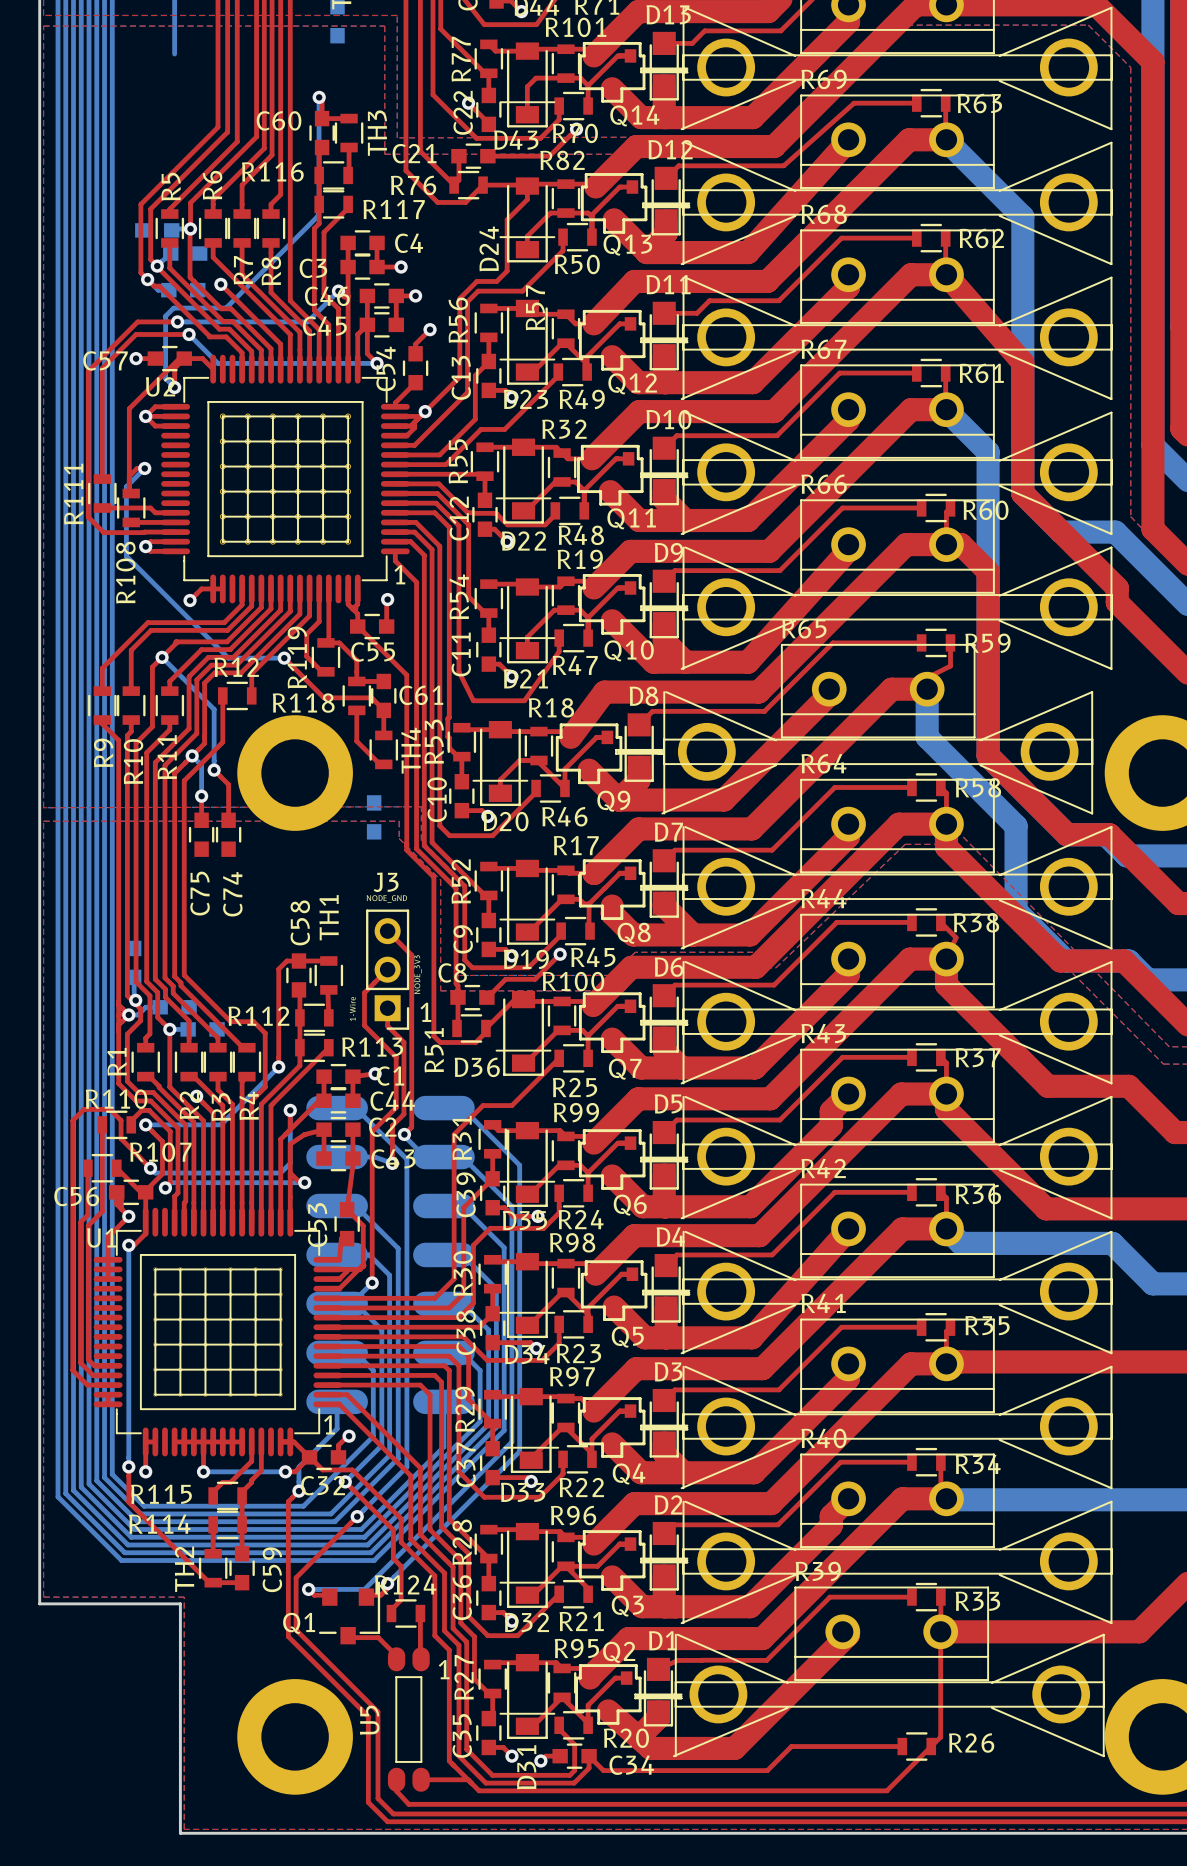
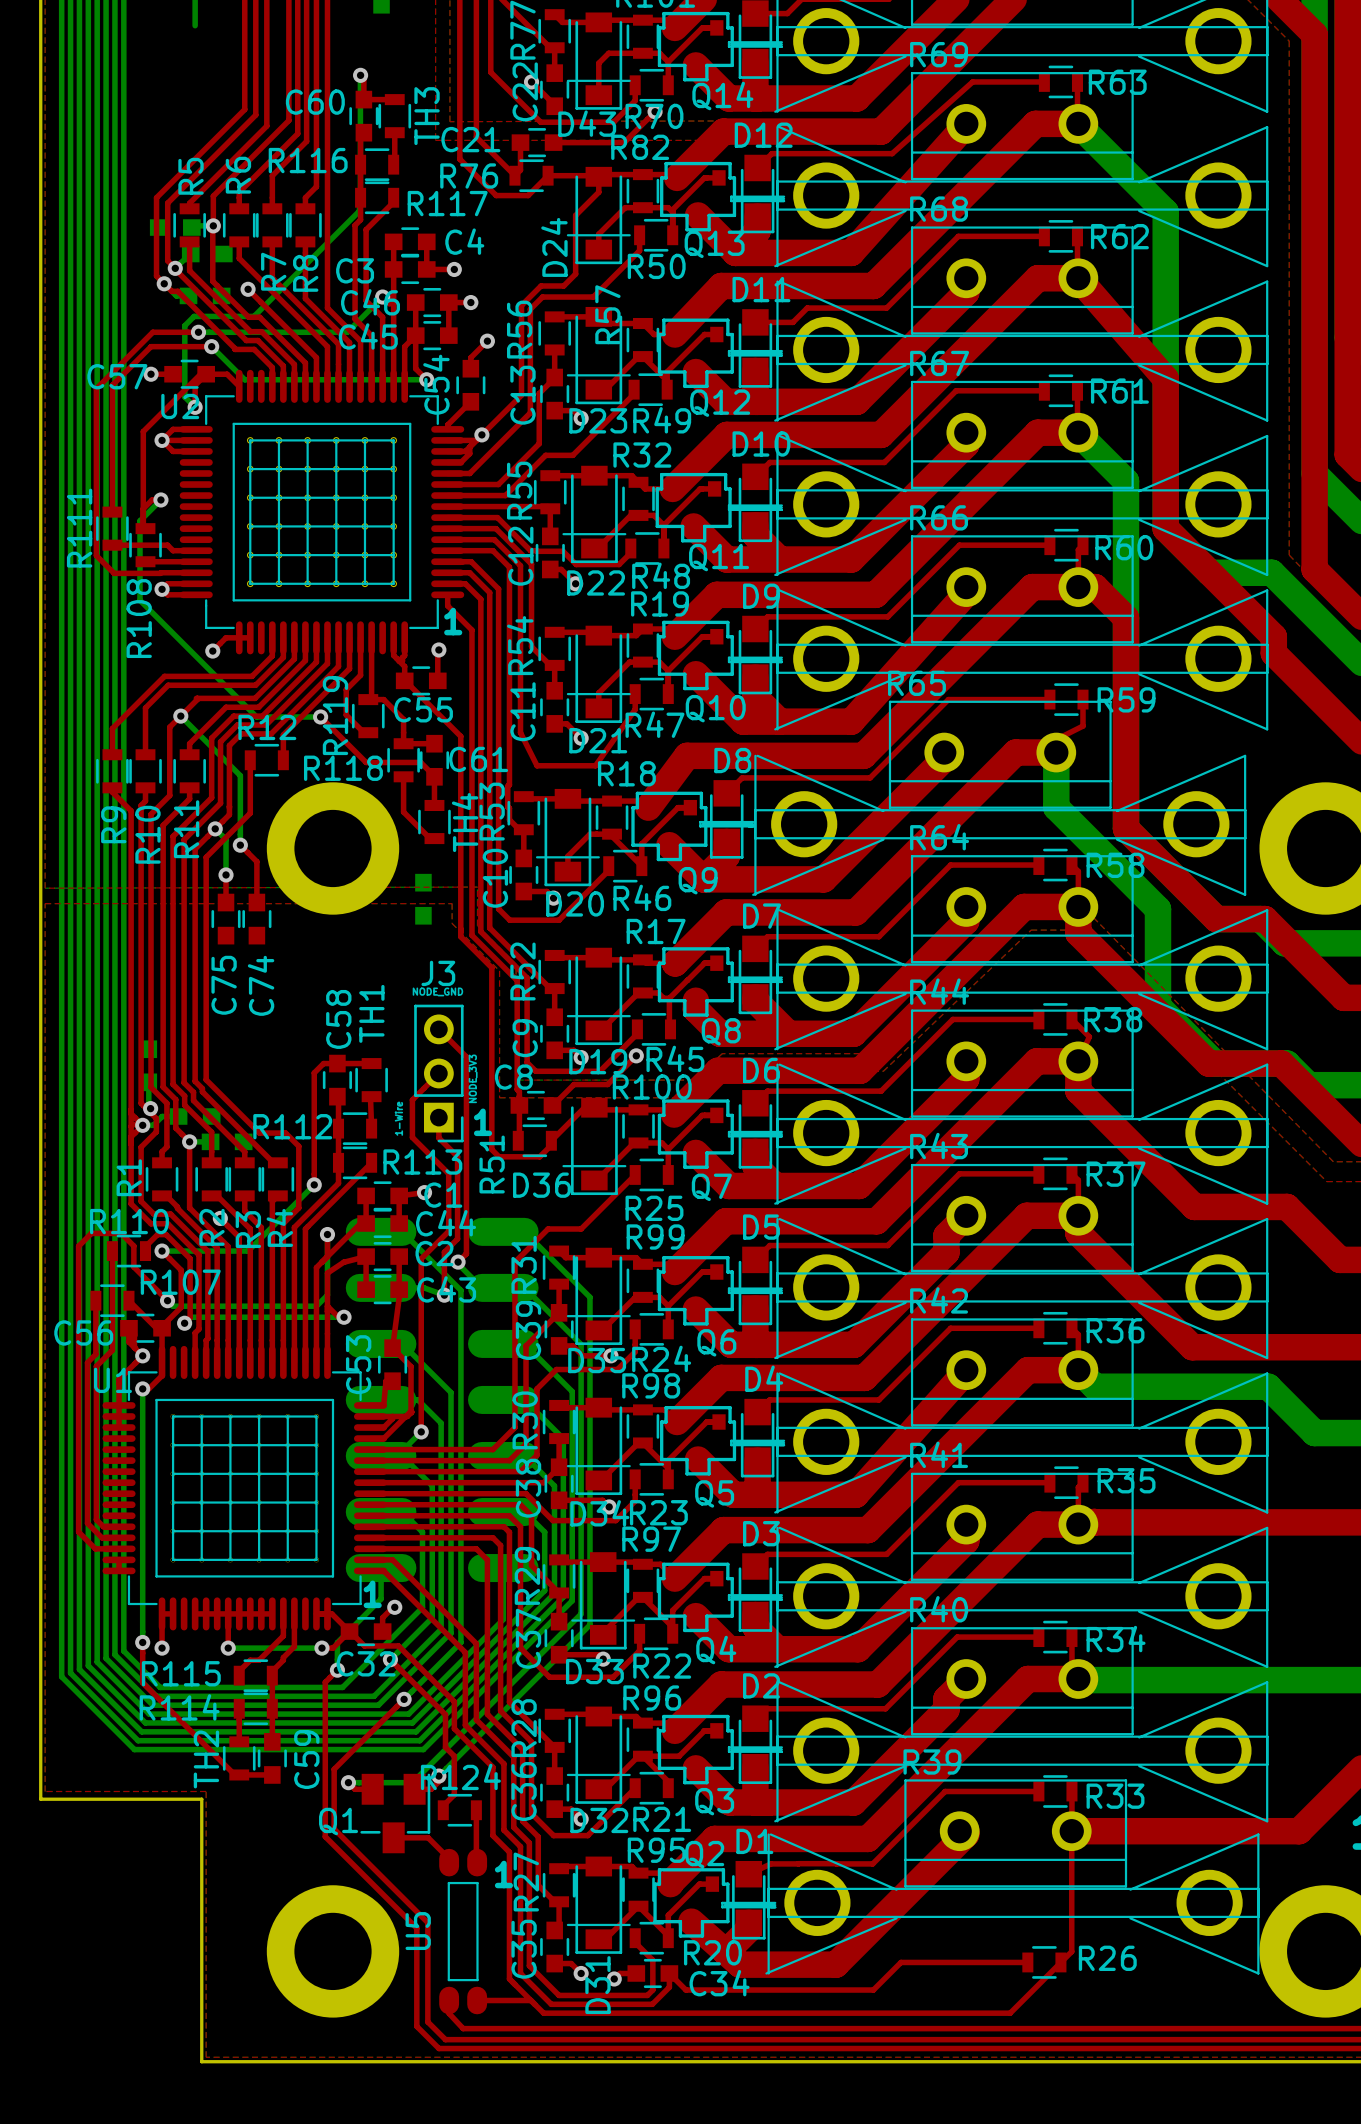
Q1 footprint: [319, 1581, 381, 1645] -> [360, 1773, 431, 1854]

